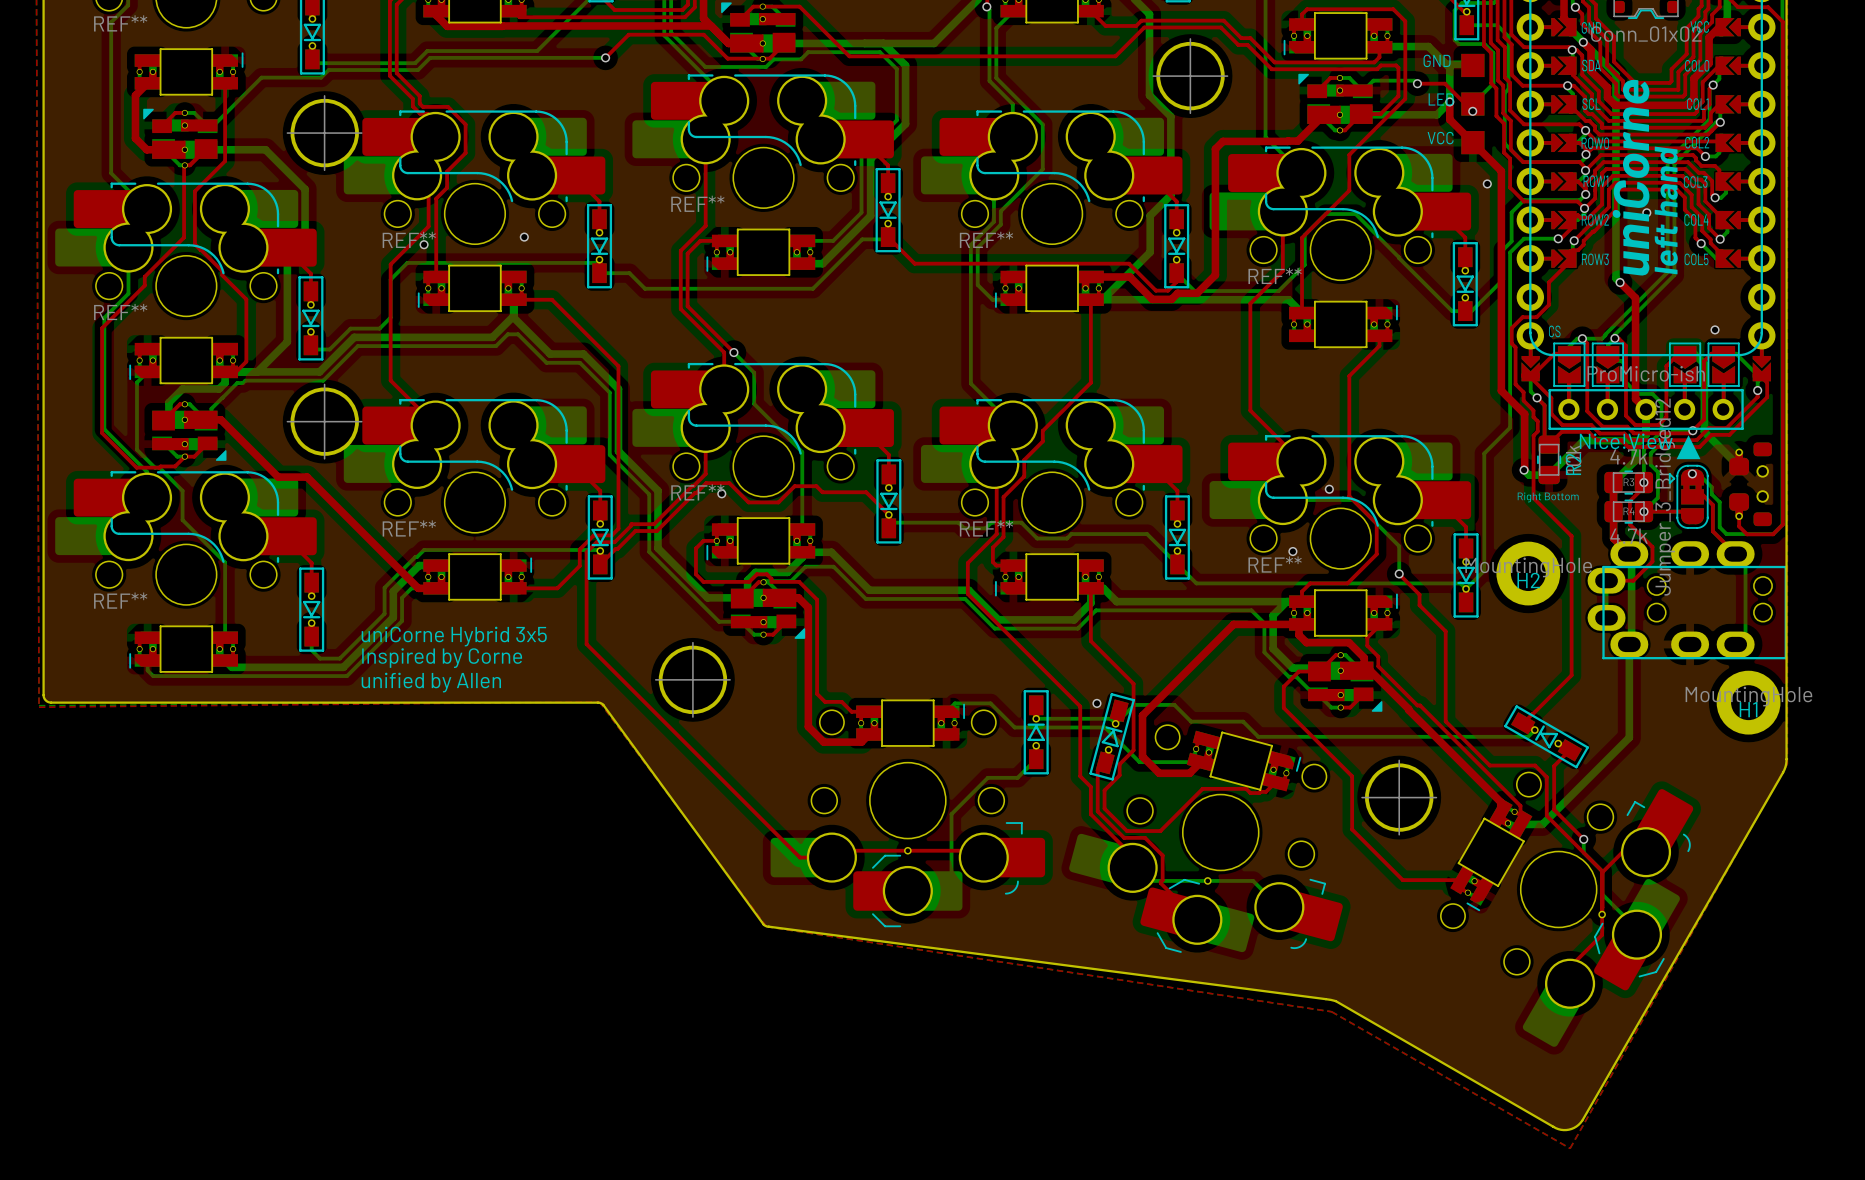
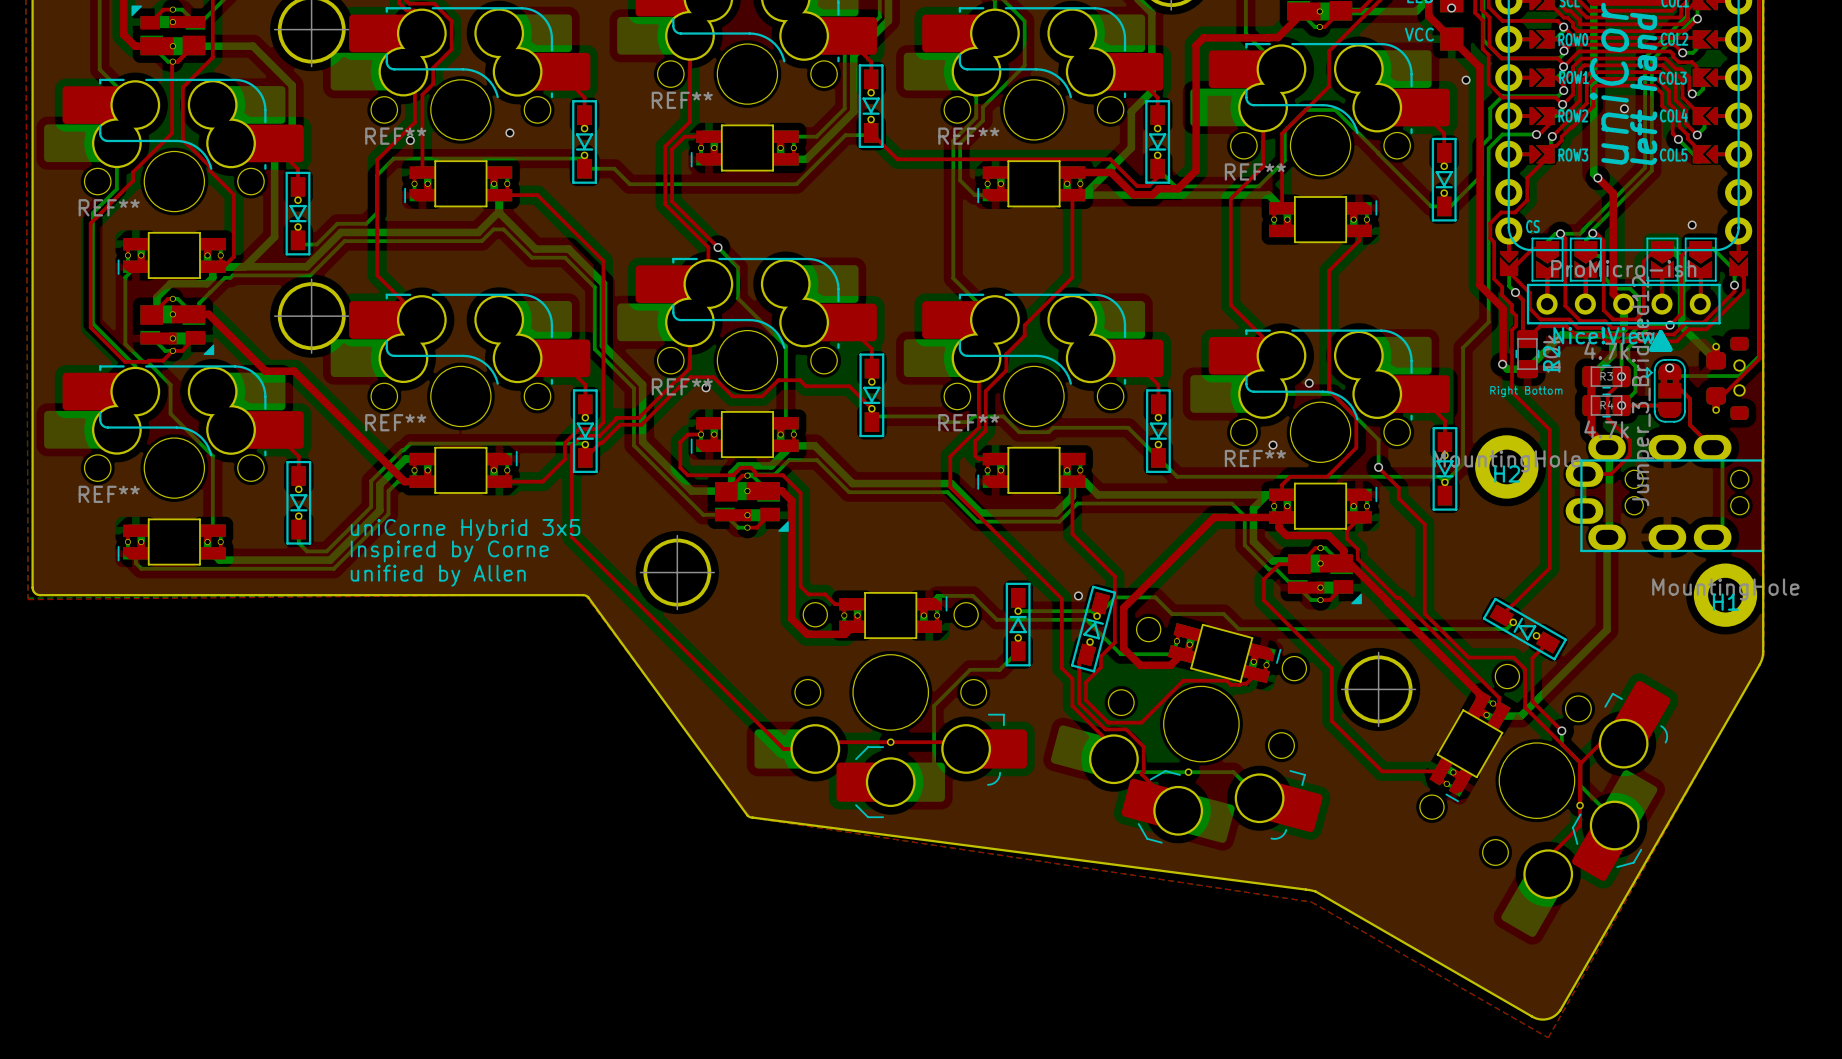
bottom track: (1782, 461) (1782, 524) (1773, 534) (1726, 534) (1719, 527) (1719, 502) (1711, 494) (1711, 487) (1698, 473) -> (1759, 356) (1739, 376) (1676, 376) (1668, 368) (1669, 369)
top track: (1782, 464) (1782, 524) (1773, 534) (1747, 534) (1739, 526) (1739, 516) -> (1759, 358) (1722, 395)

